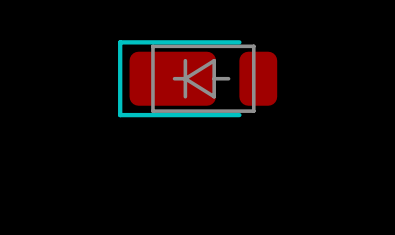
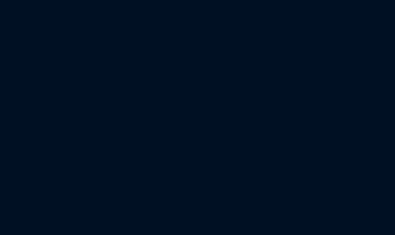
part: (197, 78) -> none

